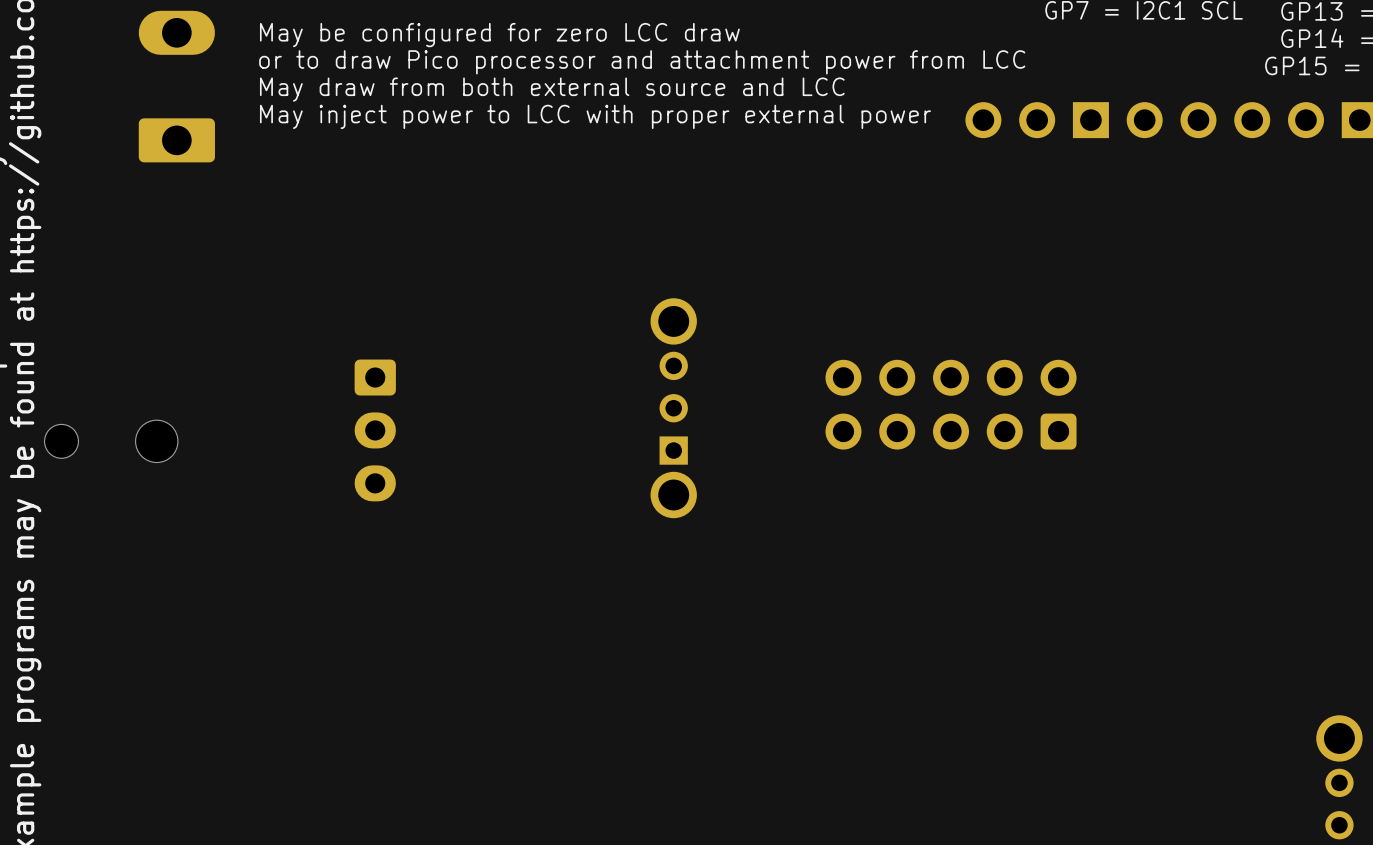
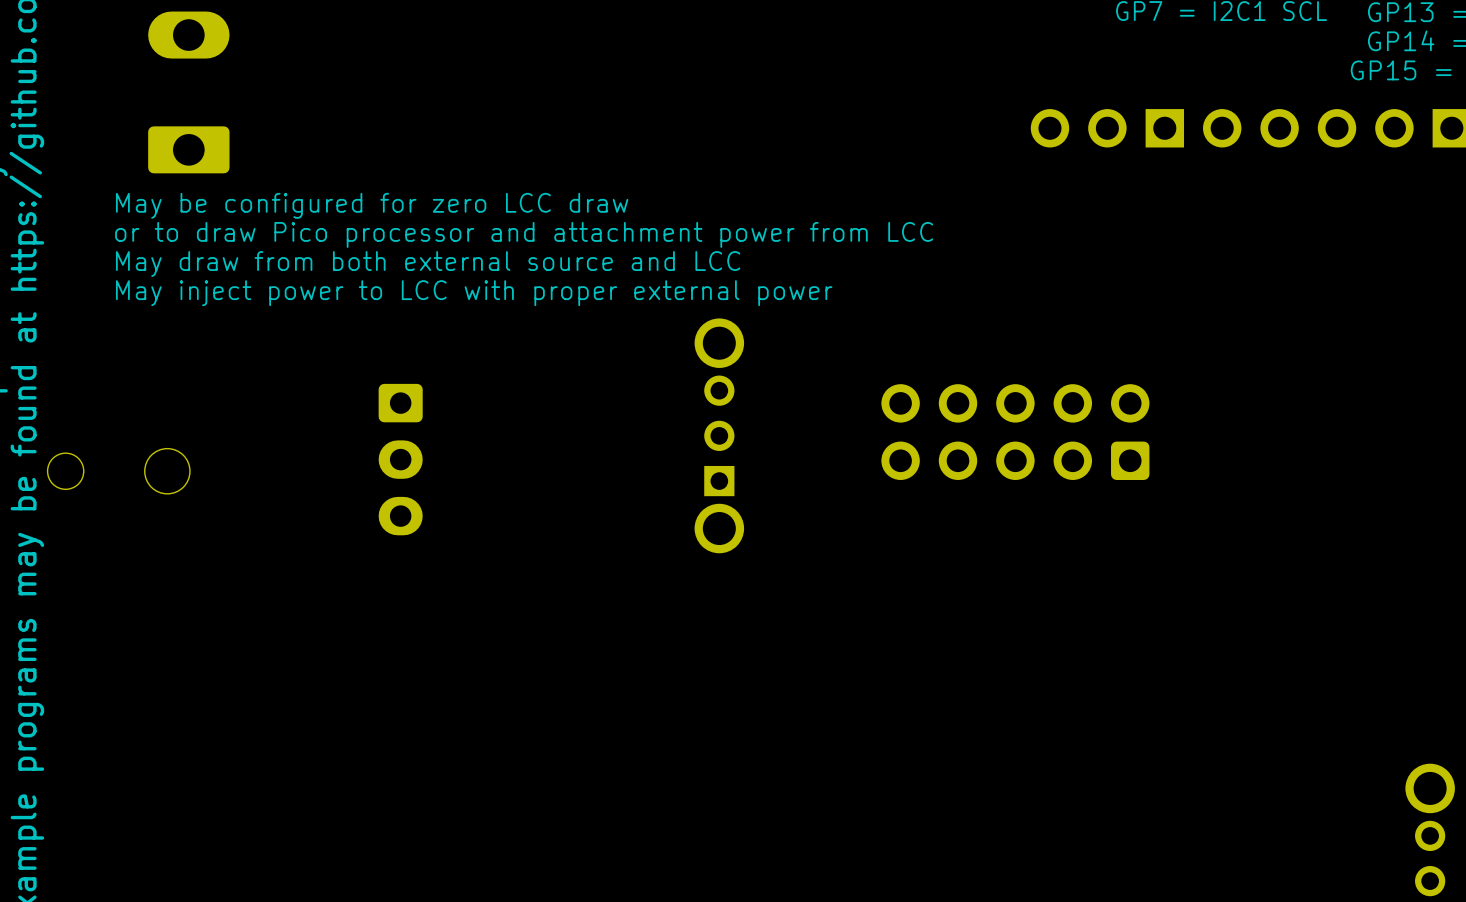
text position: May be configured for zero LCC draw (499, 35) -> May be configured for zero LCC draw (372, 205)
text position: or to draw Pico processor and attachment power from LCC (642, 62) -> or to draw Pico processor and attachment power from LCC (524, 234)
text position: May draw from both external source and LCC (552, 89) -> May draw from both external source and LCC (428, 264)
text position: May inject power to LCC with proper external power (595, 116) -> May inject power to LCC with proper external power (474, 293)

